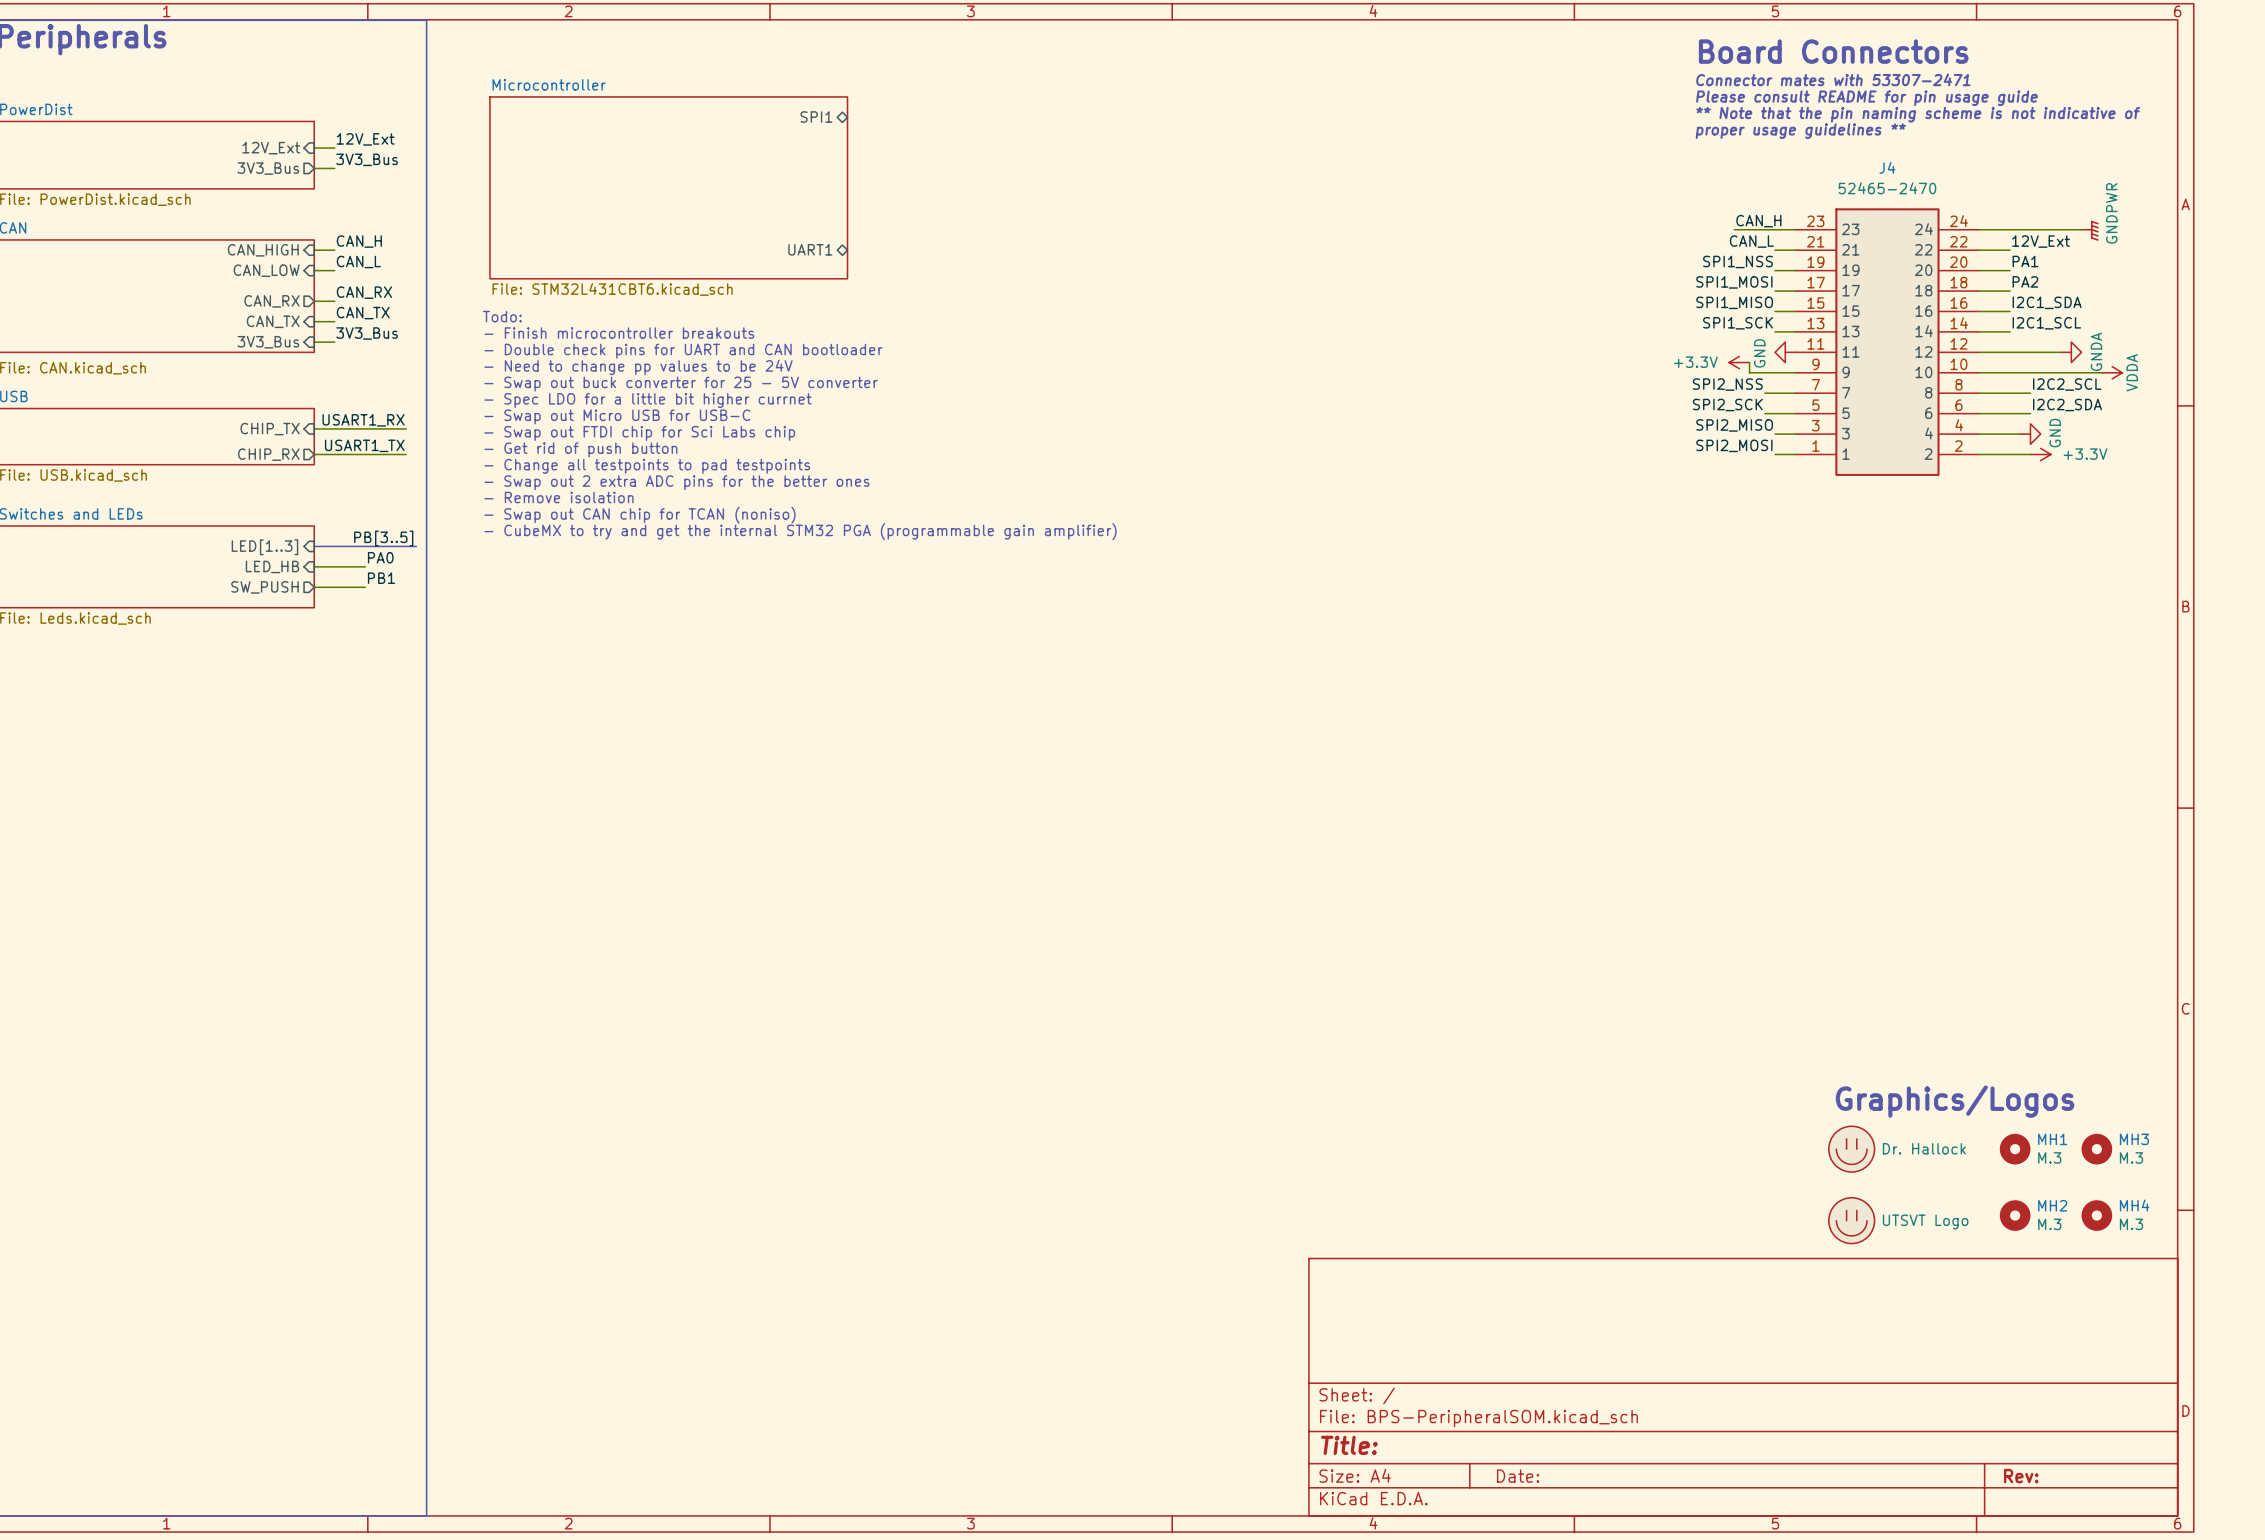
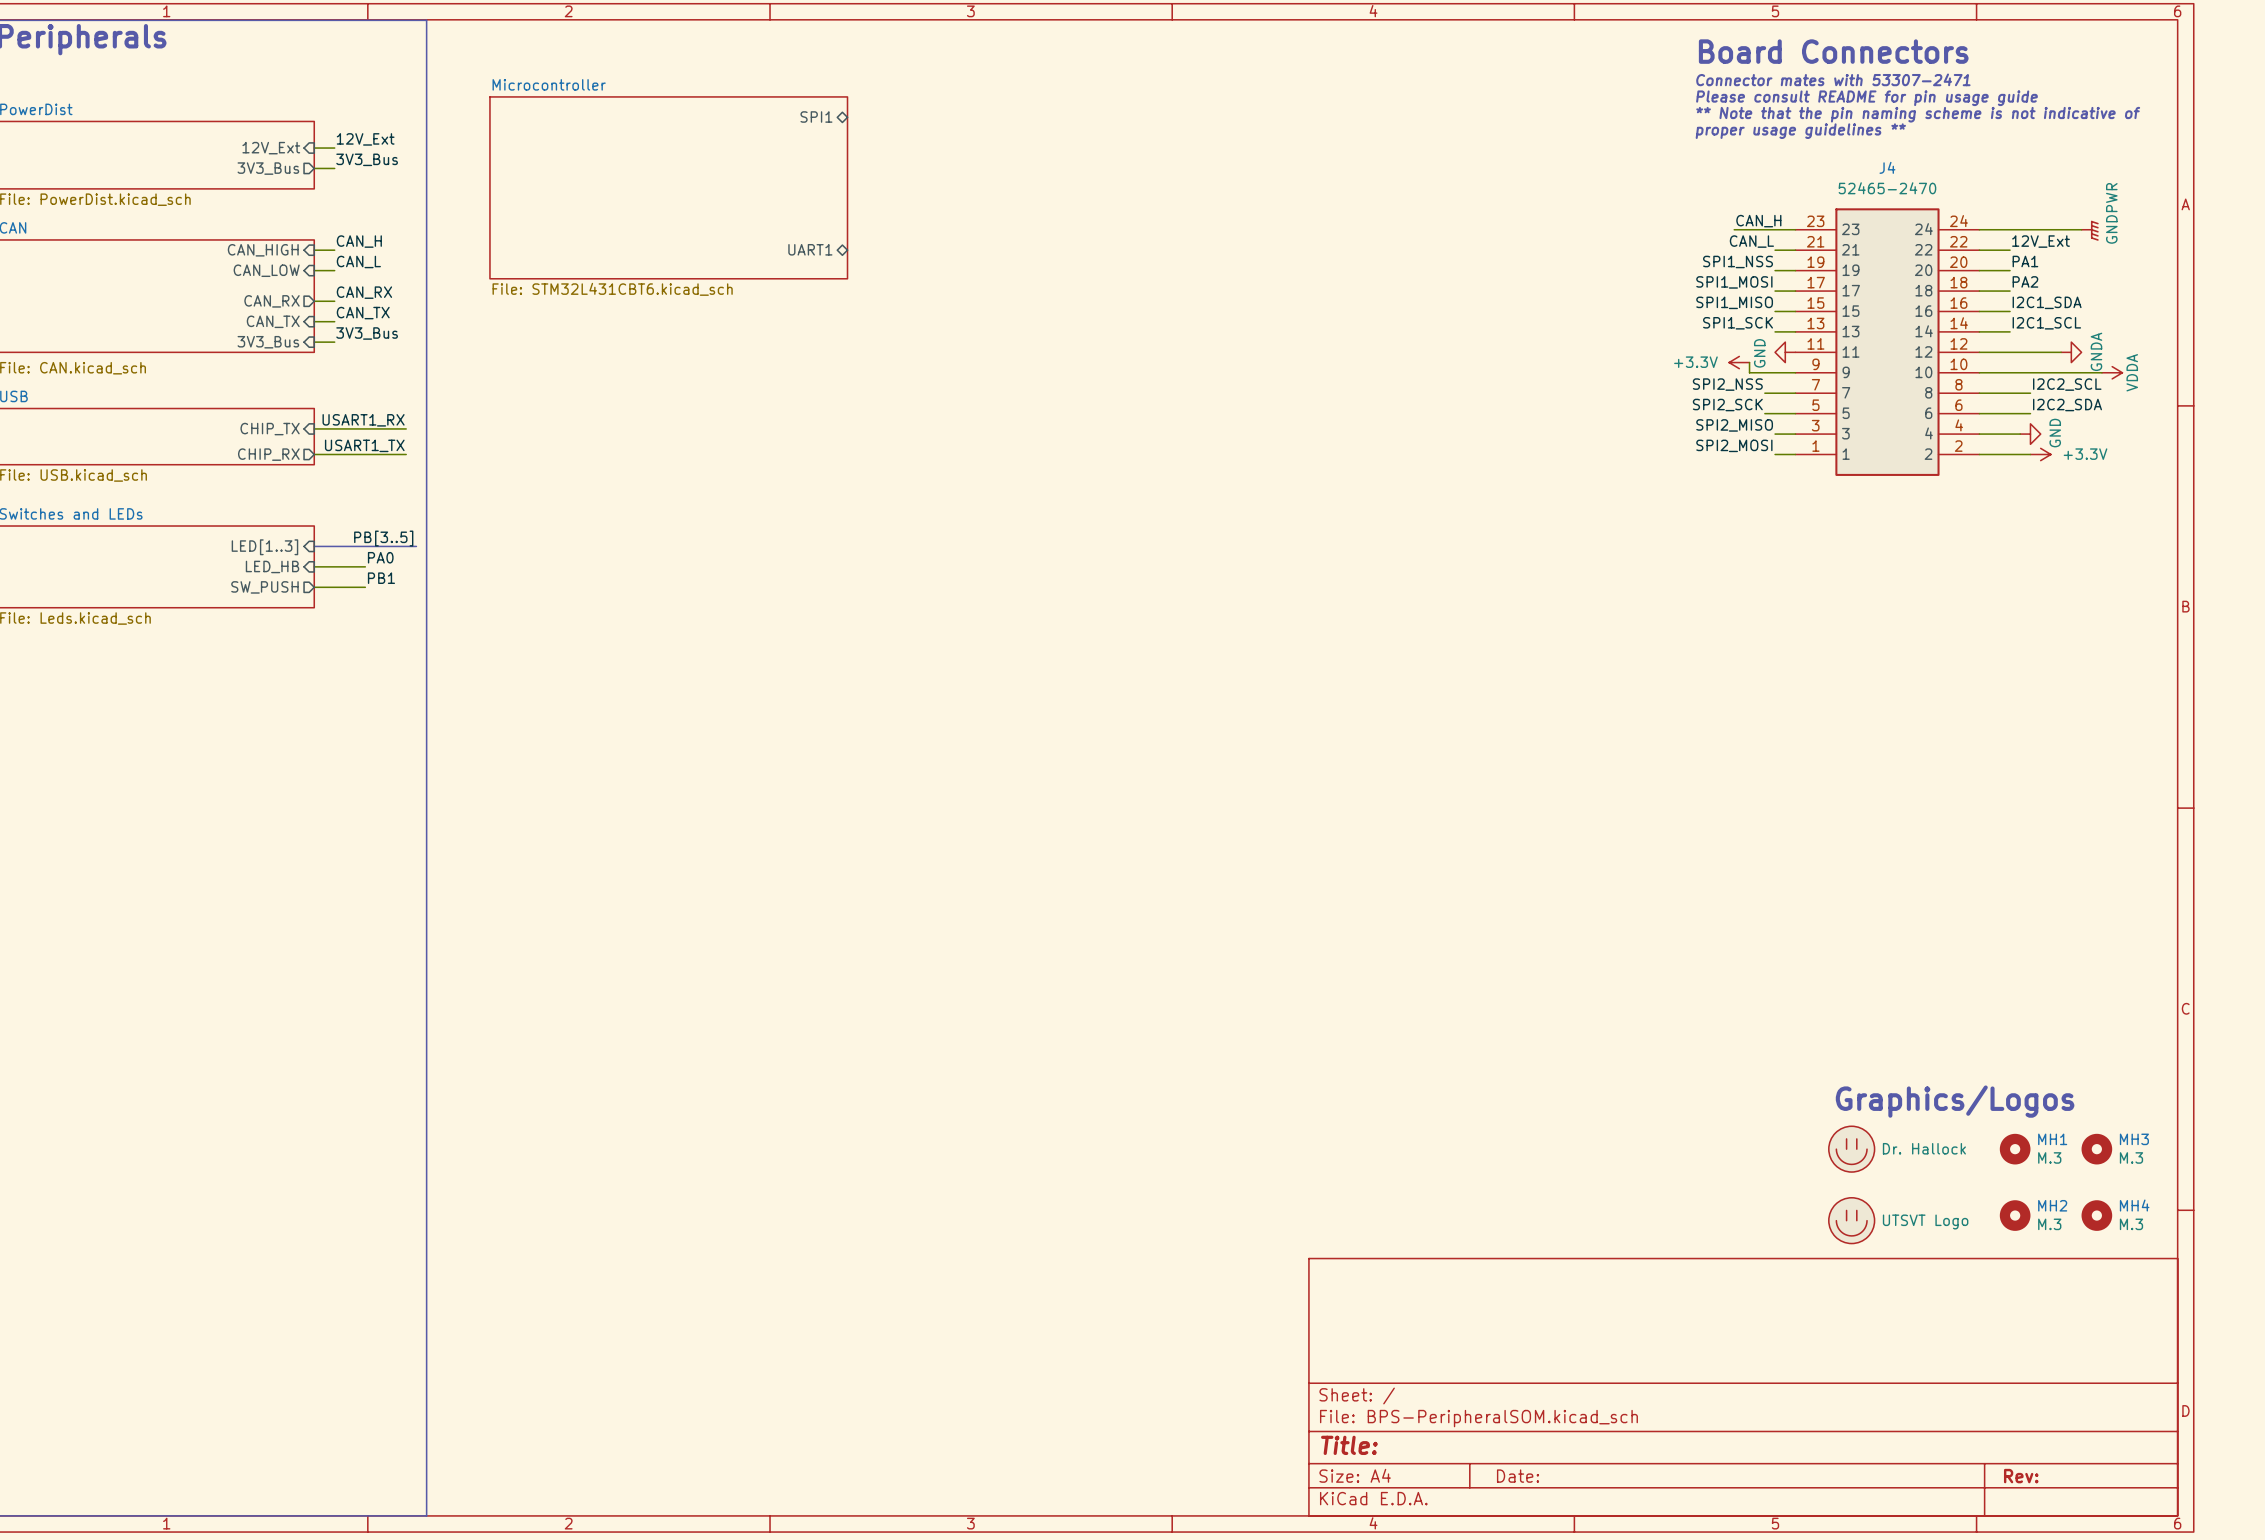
text: Todo: (502, 316) -> none
text: - Finish microcontroller breakouts (619, 333) -> none
text: - Double check pins for UART and CAN bootloader (683, 351) -> none
text: - Need to change pp values to be 24V (638, 367) -> none
text: - Swap out buck converter for 25 - 5V converter (681, 384) -> none
text: - Spec LDO for a little bit higher currnet (647, 400) -> none
text: - Swap out Micro USB for USB-C (617, 416) -> none
text: - Swap out FTDI chip for Sci Labs chip (639, 433) -> none
text: - Get rid of push button (580, 449) -> none
text: - Change all testpoints to pad testpoints (647, 466) -> none
text: - Swap out 2 extra ADC pins for the better ones (676, 482) -> none
text: - Remove isolation (558, 497) -> none
text: - Swap out CAN chip for TCAN (noniso) (639, 515) -> none
text: - CubeMX to try and get the internal STM32 PGA (programmable gain amplifier) (800, 531) -> none

